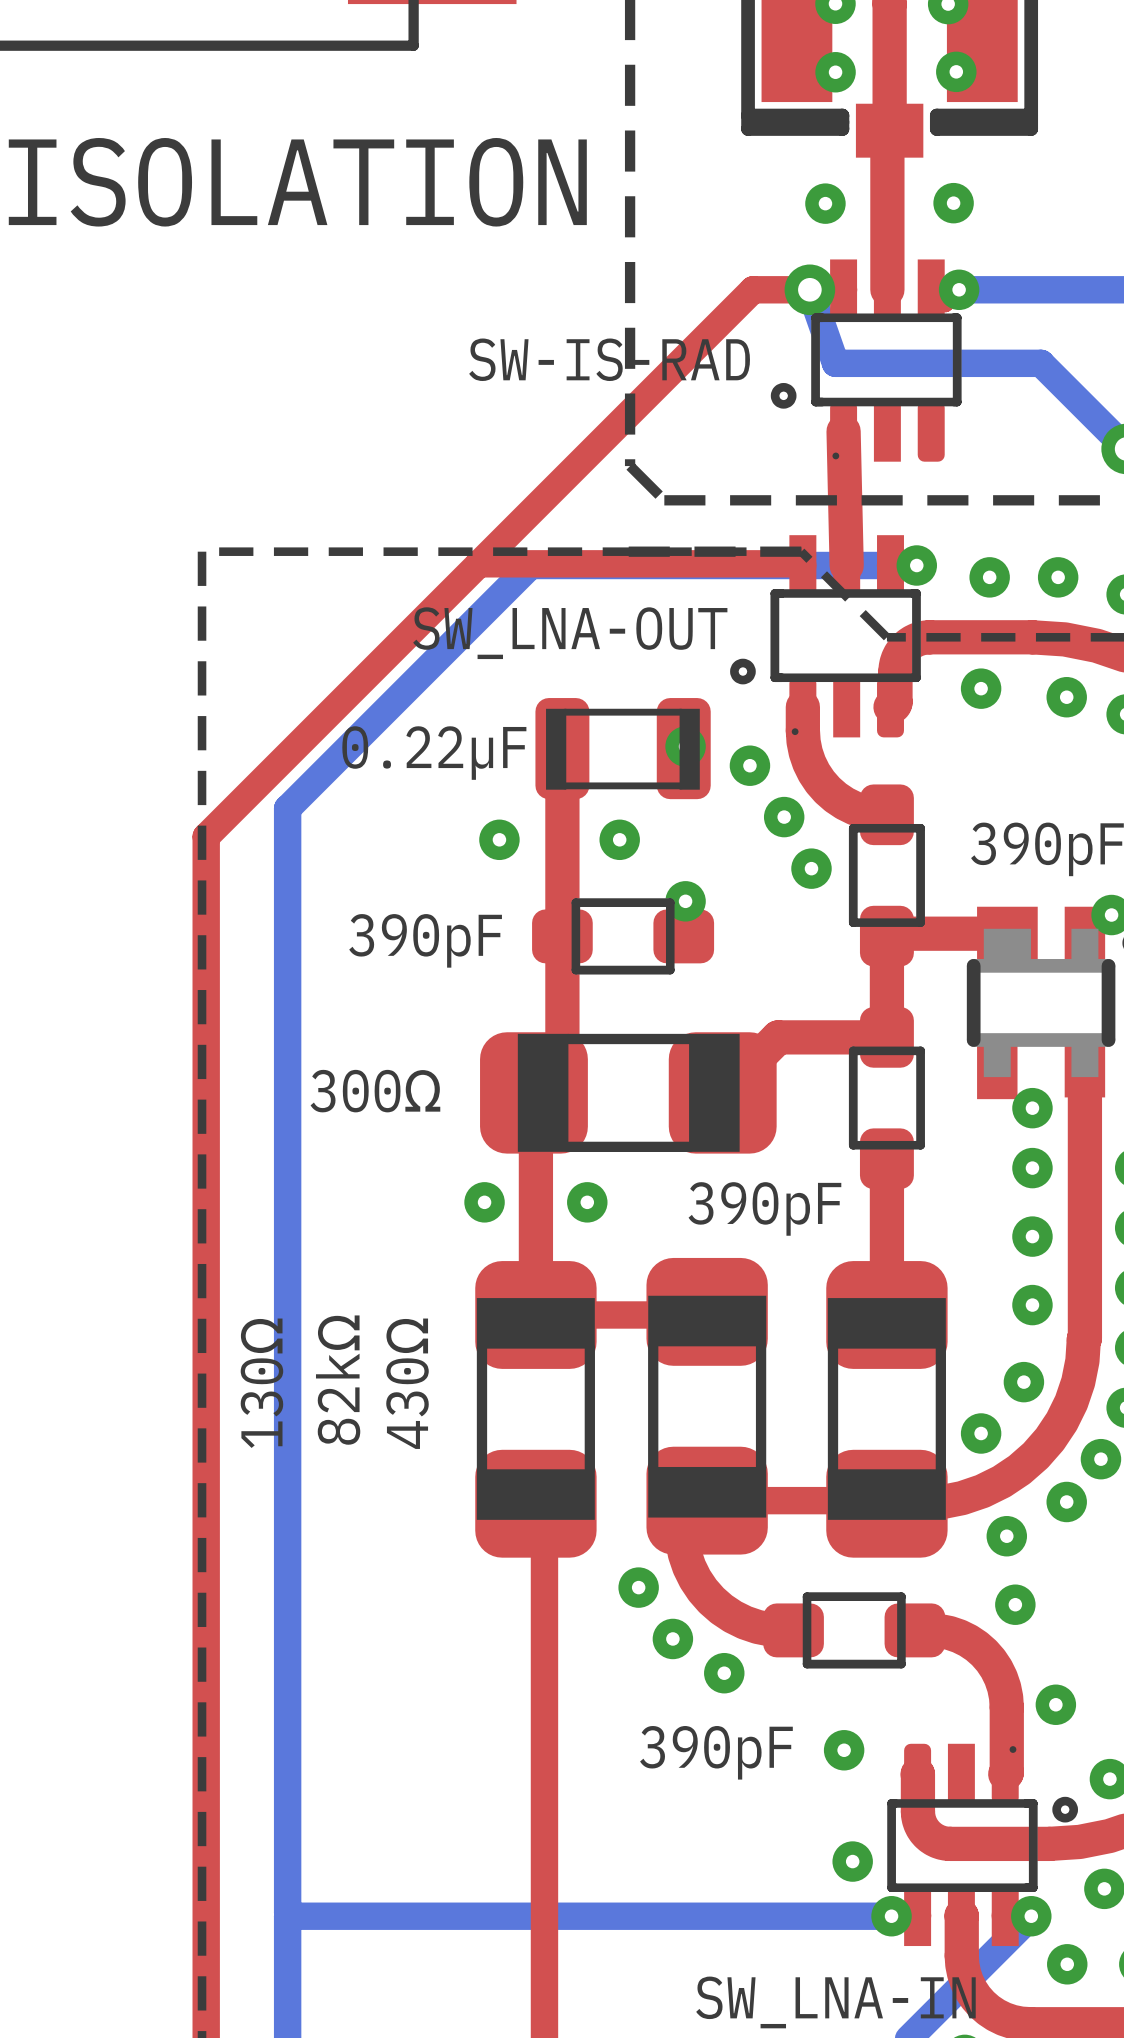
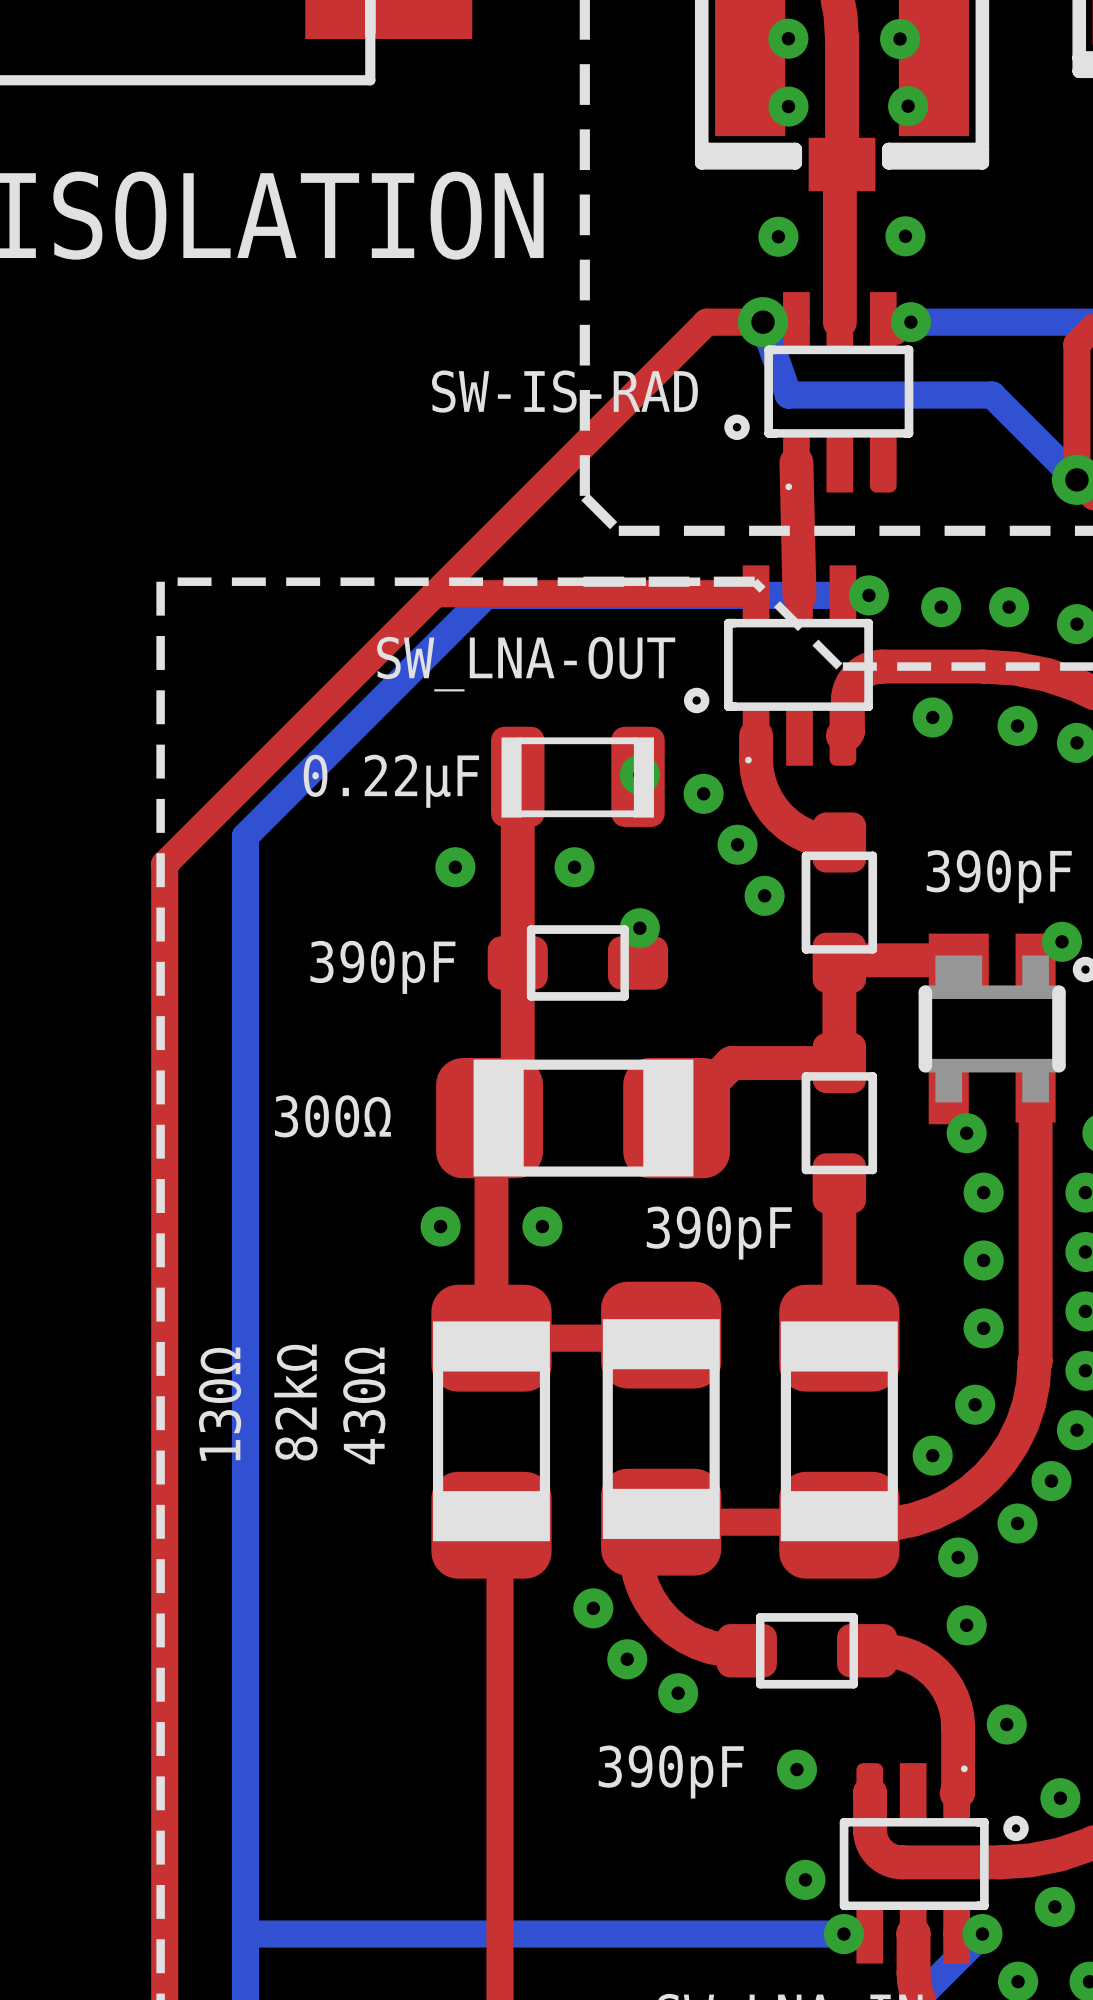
via position: (1032, 1108) -> (966, 1133)

